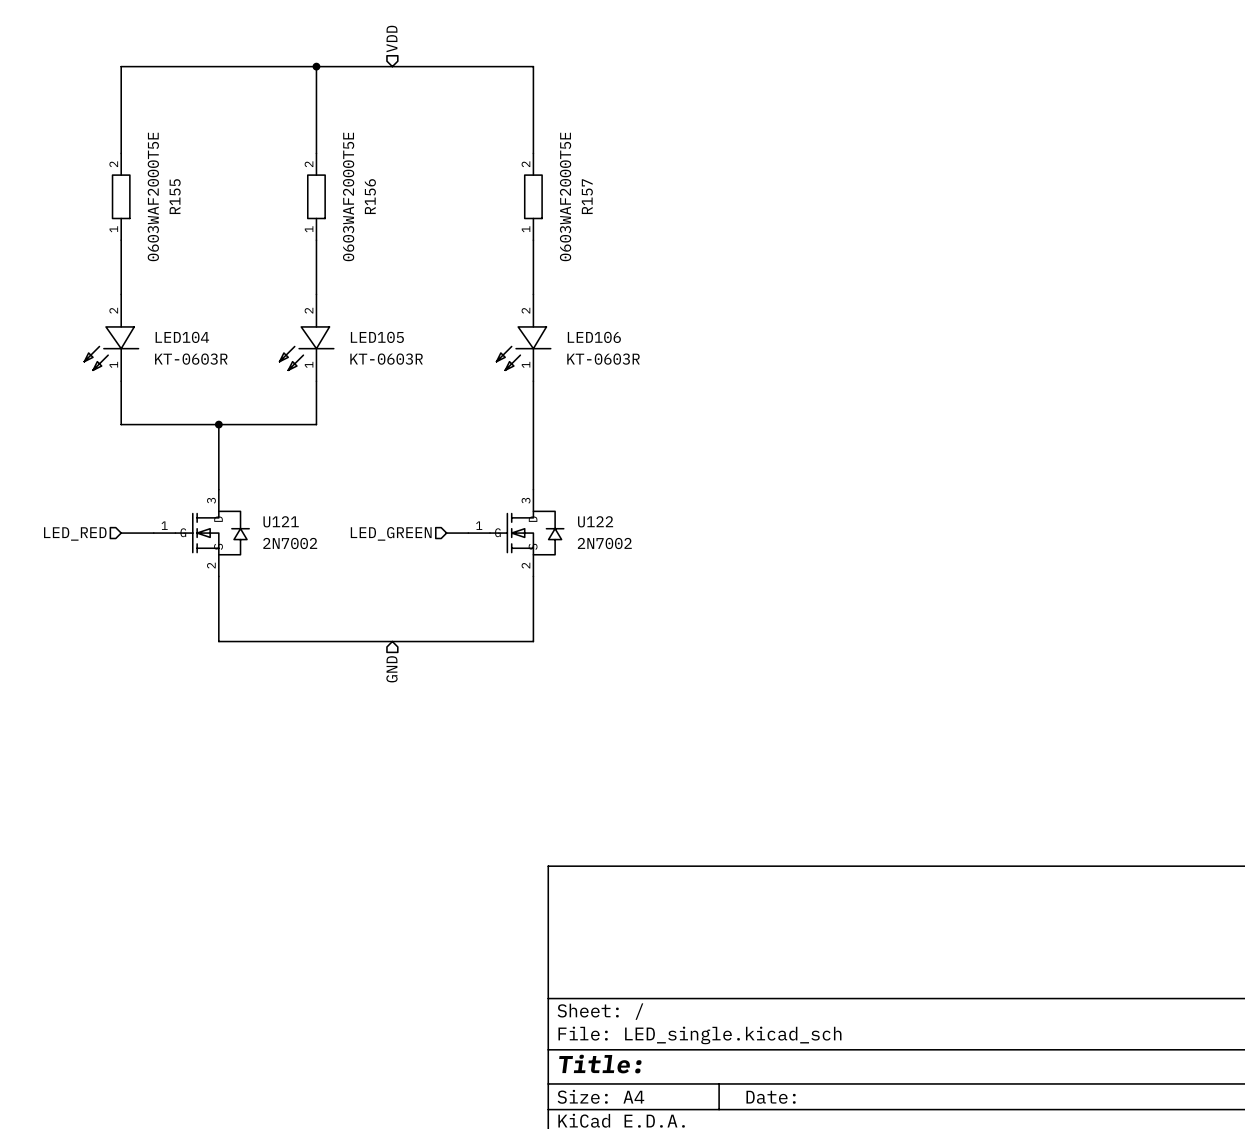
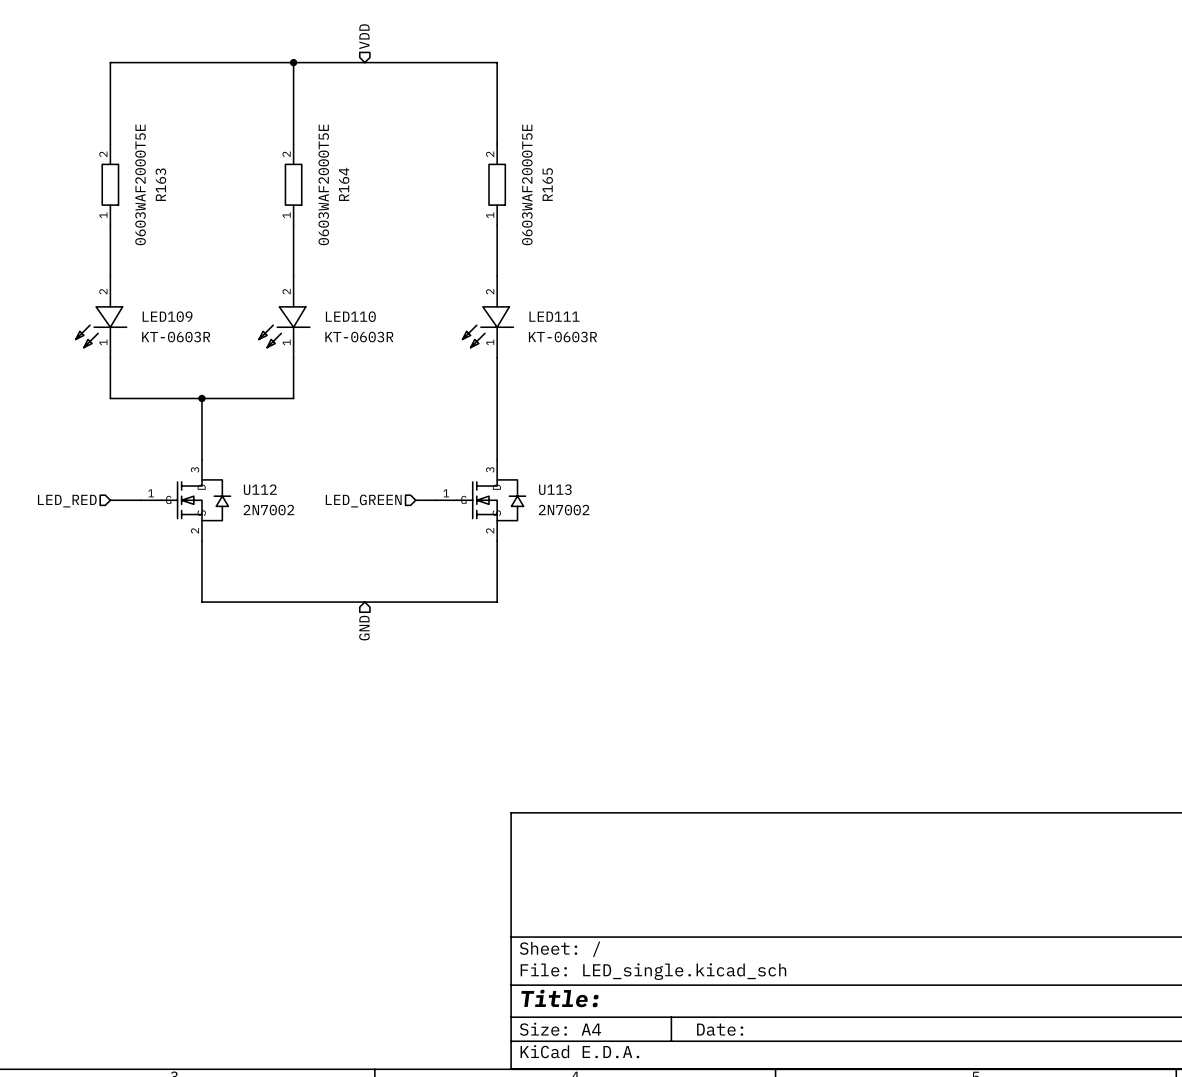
R155 name: R155 (175, 196) -> R163 (160, 184)
R156 name: R156 (370, 196) -> R164 (344, 184)
R157 name: R157 (587, 196) -> R165 (547, 184)
LED104 name: LED104 (182, 337) -> LED109 (167, 316)
LED105 name: LED105 (377, 337) -> LED110 (350, 316)
LED106 name: LED106 (594, 337) -> LED111 (554, 316)
U121 name: U121 (281, 521) -> U112 (260, 489)
U122 name: U122 (595, 521) -> U113 (555, 489)

